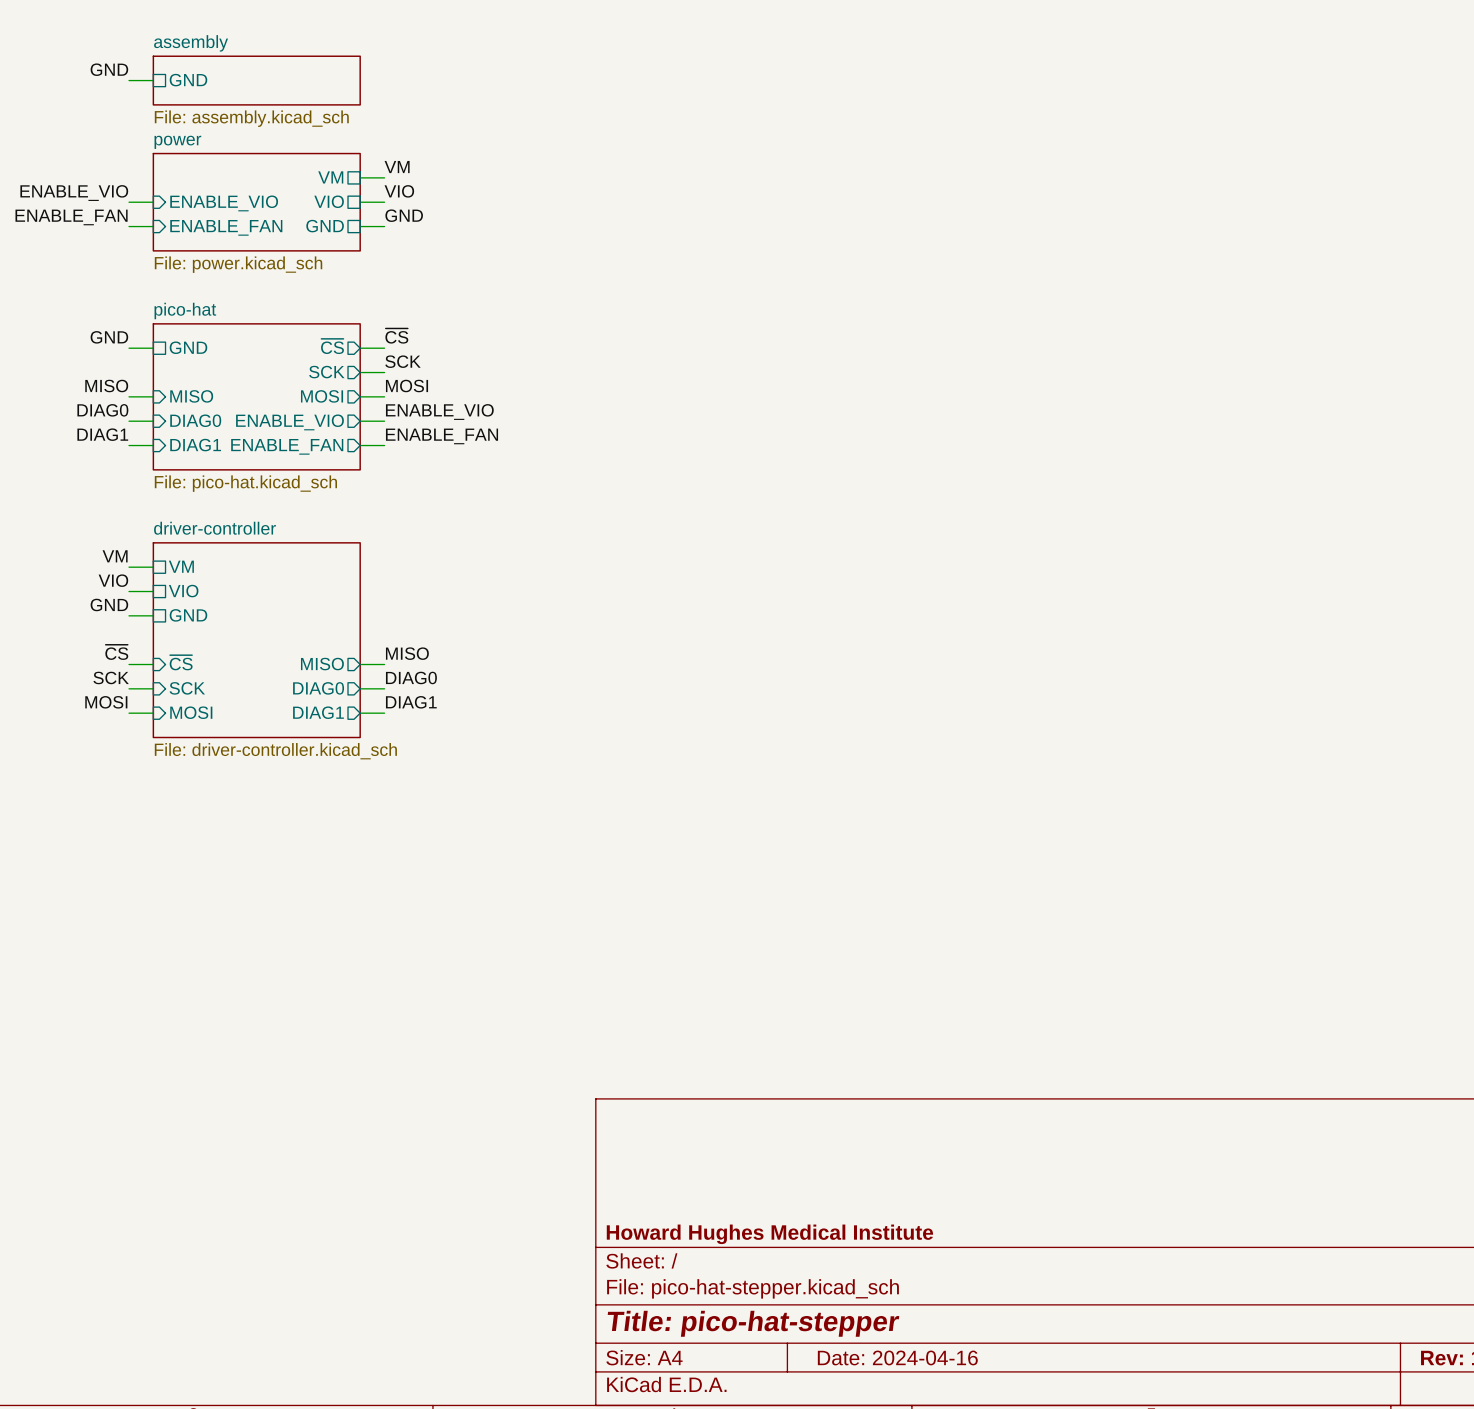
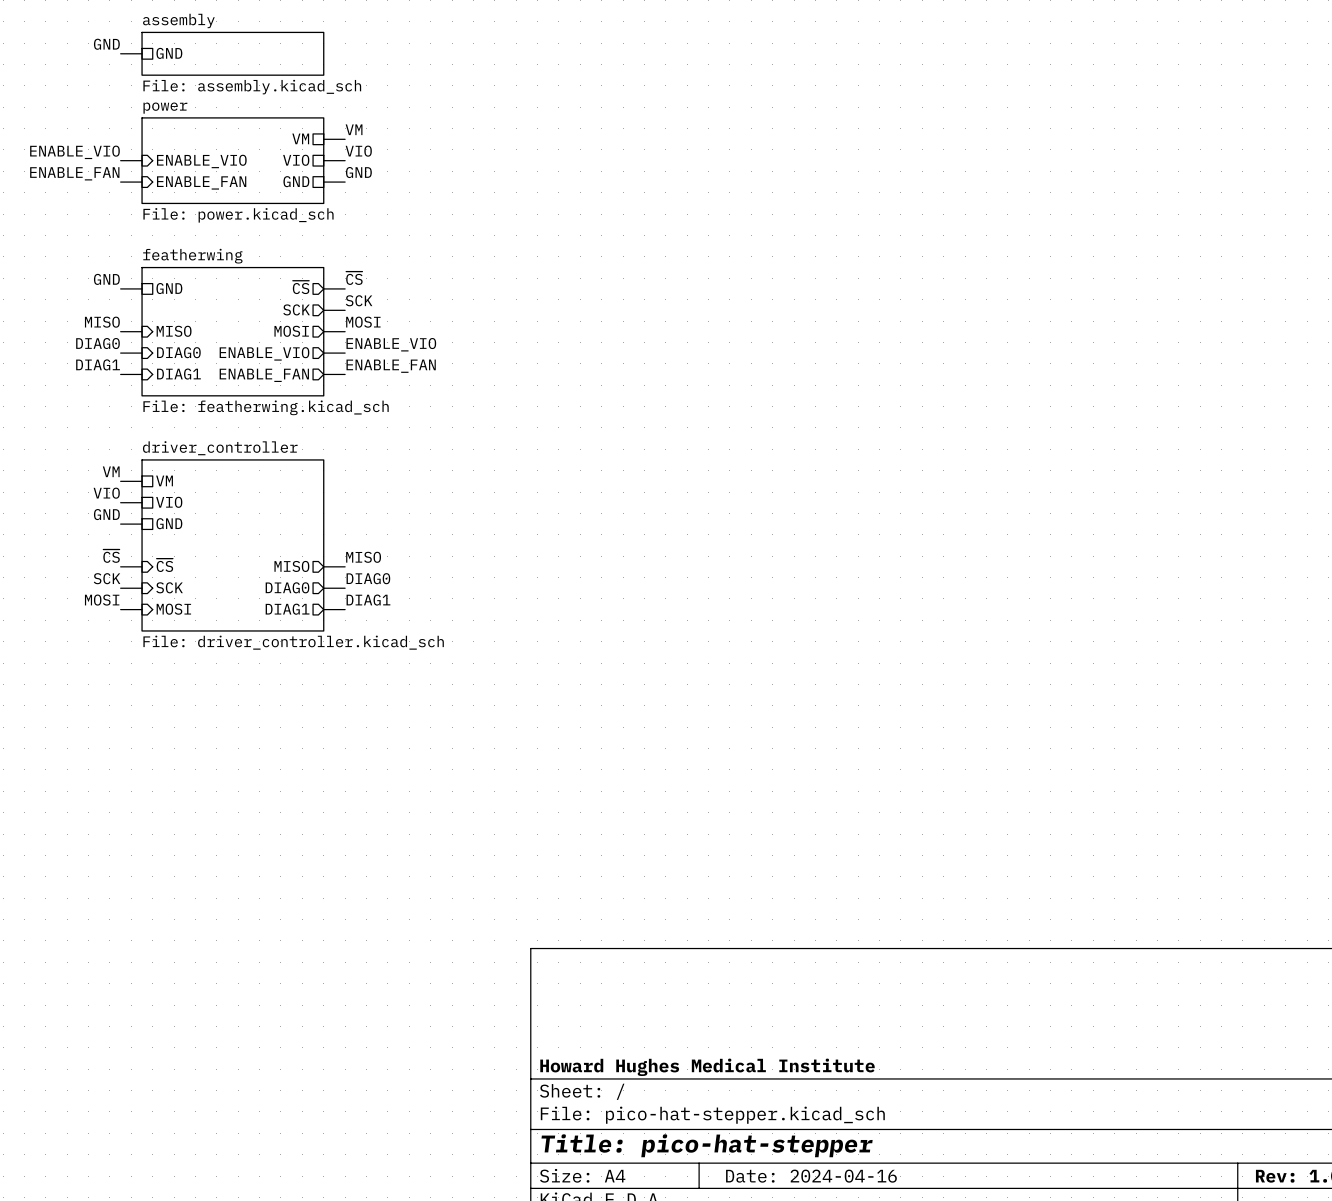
sheet pico-hat name: pico-hat (185, 310) -> featherwing (192, 256)
sheet pico-hat value: File: pico-hat.kicad_sch (245, 483) -> File: featherwing.kicad_sch (266, 407)
sheet driver-controller name: driver-controller (215, 528) -> driver_controller (220, 448)
sheet driver-controller value: File: driver-controller.kicad_sch (275, 751) -> File: driver_controller.kicad_sch (293, 642)

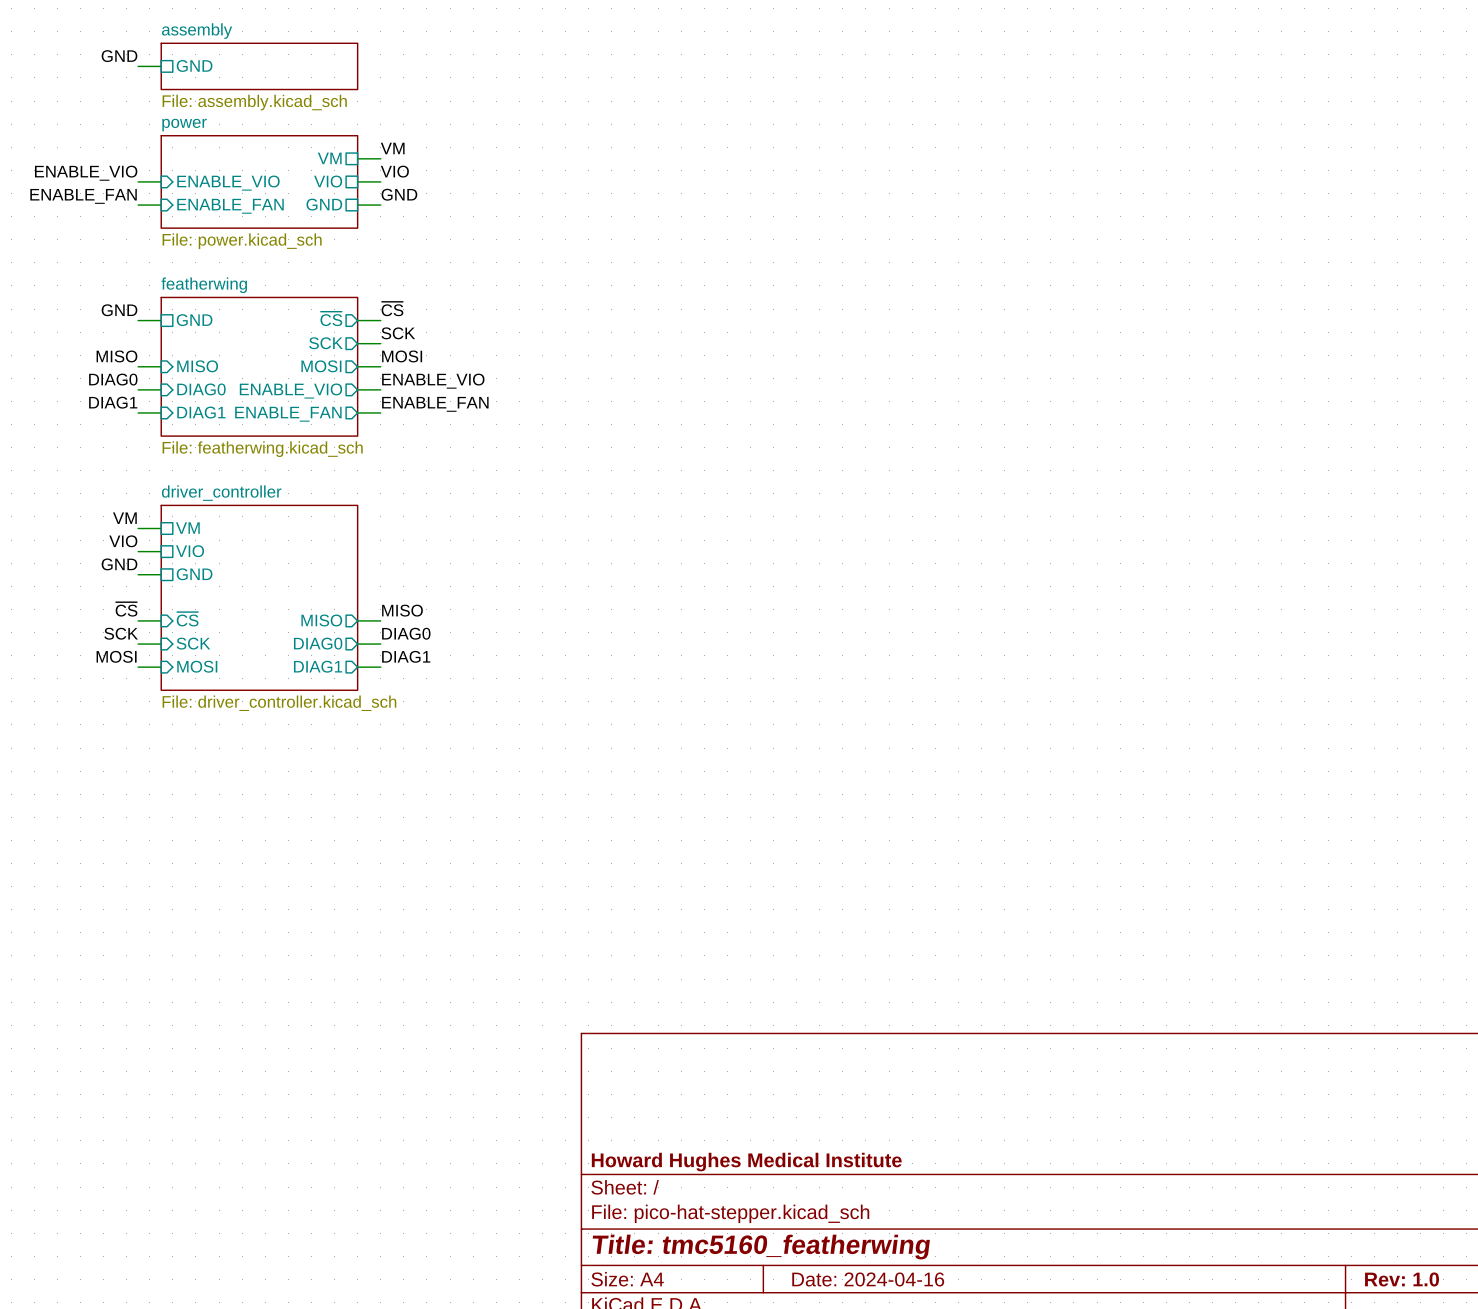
title block: Title: pico-hat-stepper (707, 1145) -> Title: tmc5160_featherwing (761, 1247)

